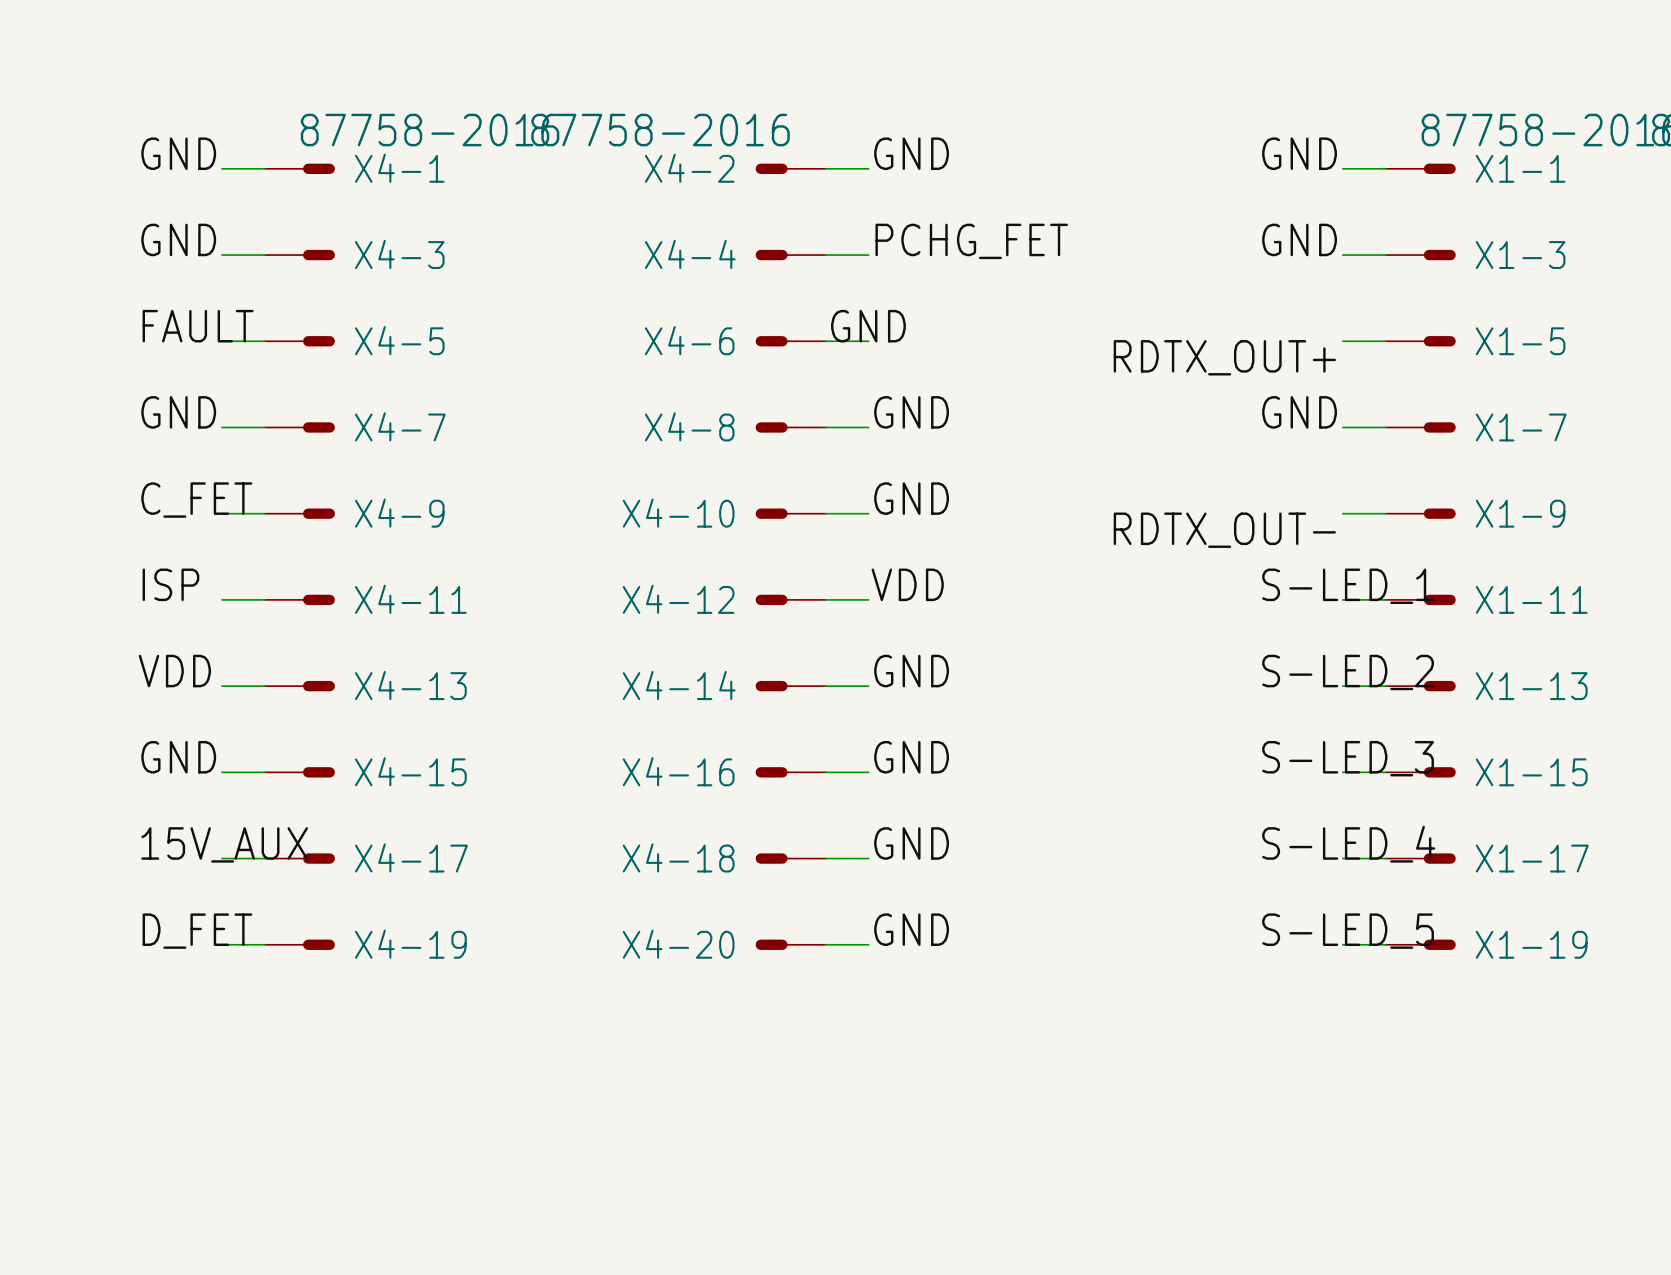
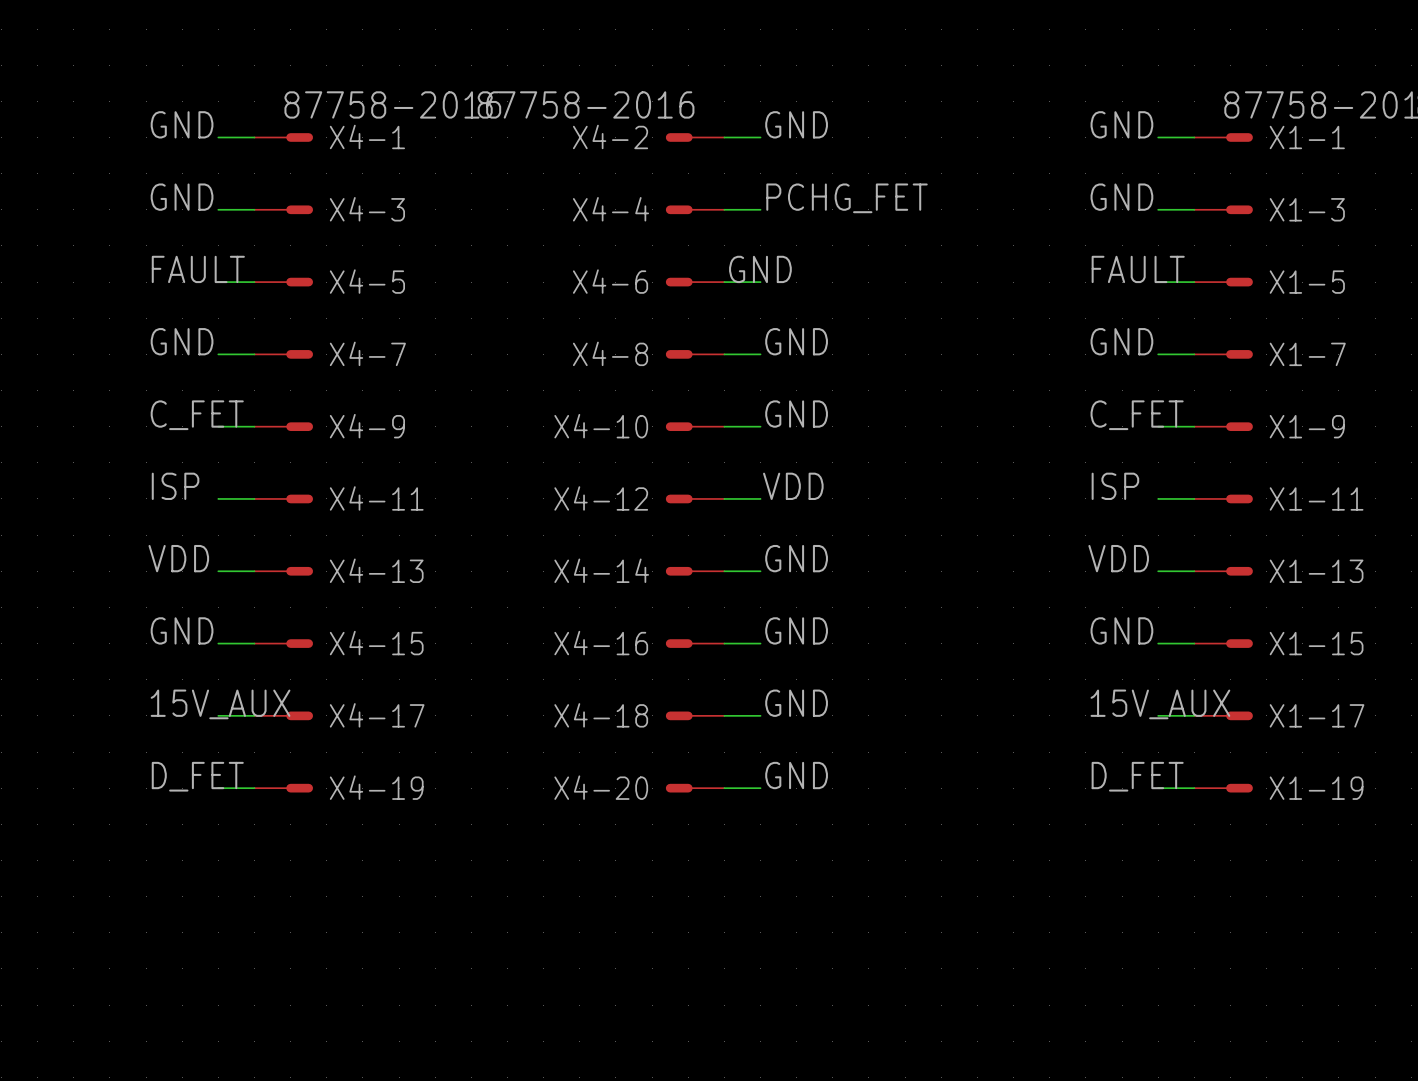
label: none -> FAULT (1138, 269)
label: RDTX_OUT+ (1224, 357) -> none
label: none -> C_FET (1137, 415)
label: RDTX_OUT- (1224, 530) -> none
label: S-LED_1 (1348, 586) -> ISP (1115, 486)
label: S-LED_2 (1348, 672) -> VDD (1118, 558)
label: S-LED_3 (1348, 758) -> GND (1121, 630)
label: S-LED_4 (1348, 844) -> 15V_AUX (1160, 704)
label: S-LED_5 (1348, 931) -> D_FET (1137, 776)

